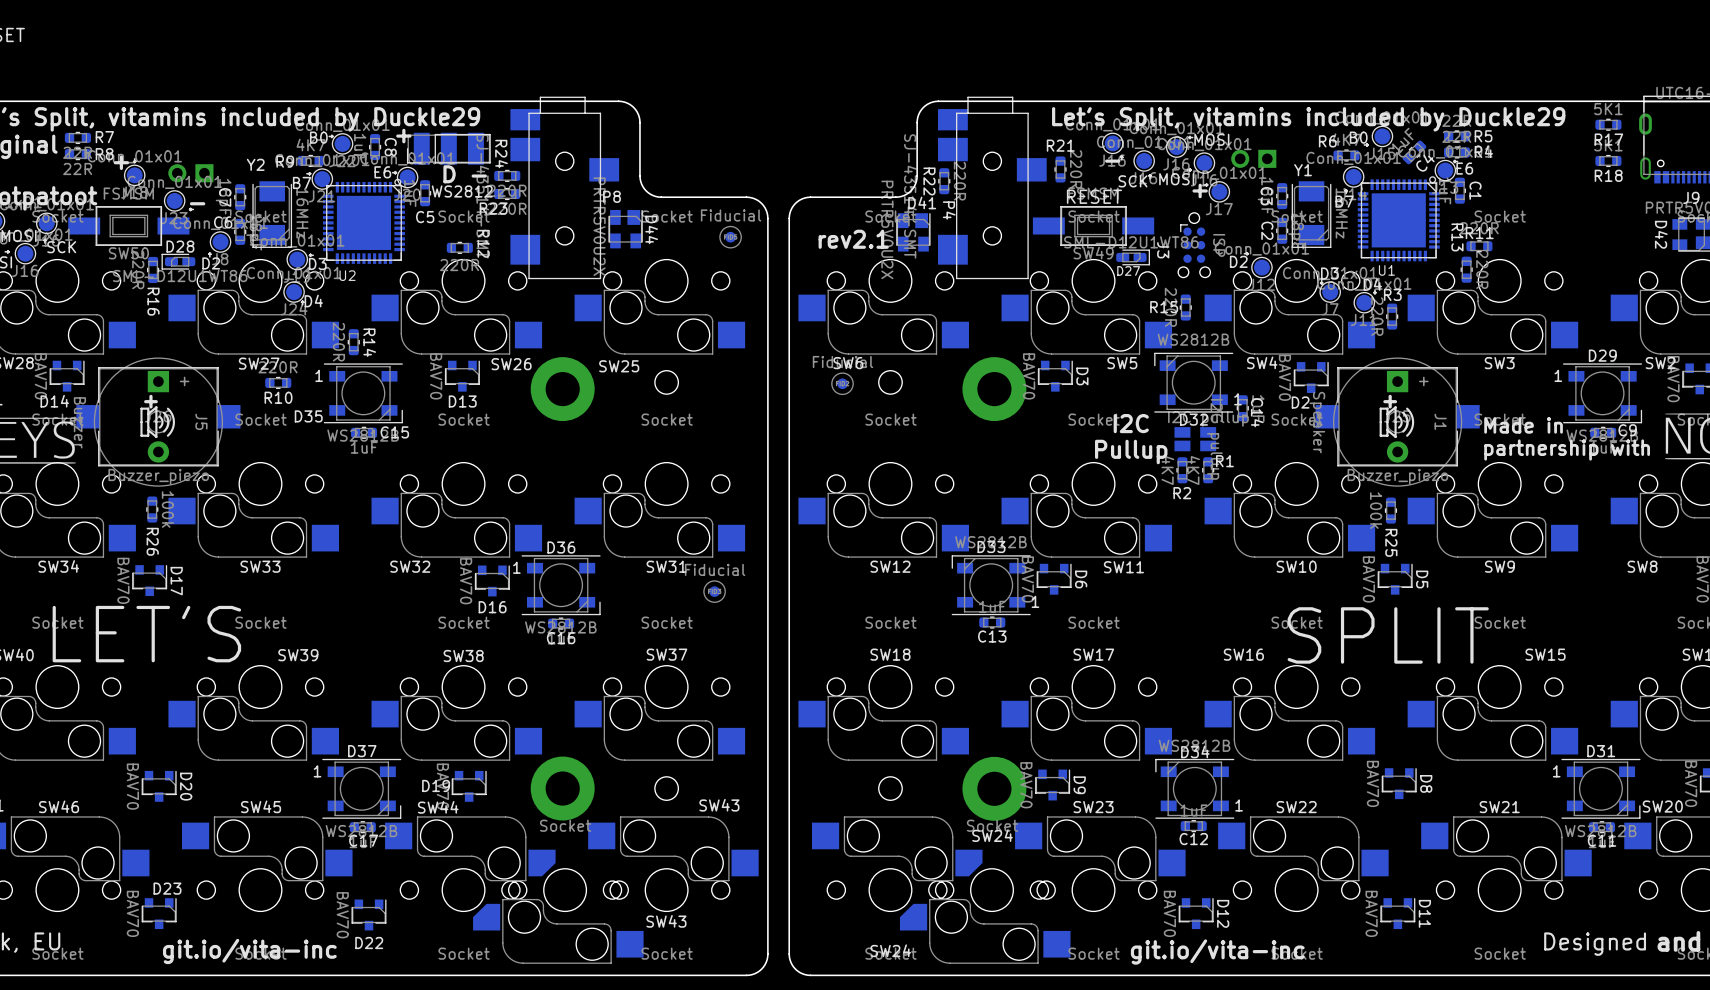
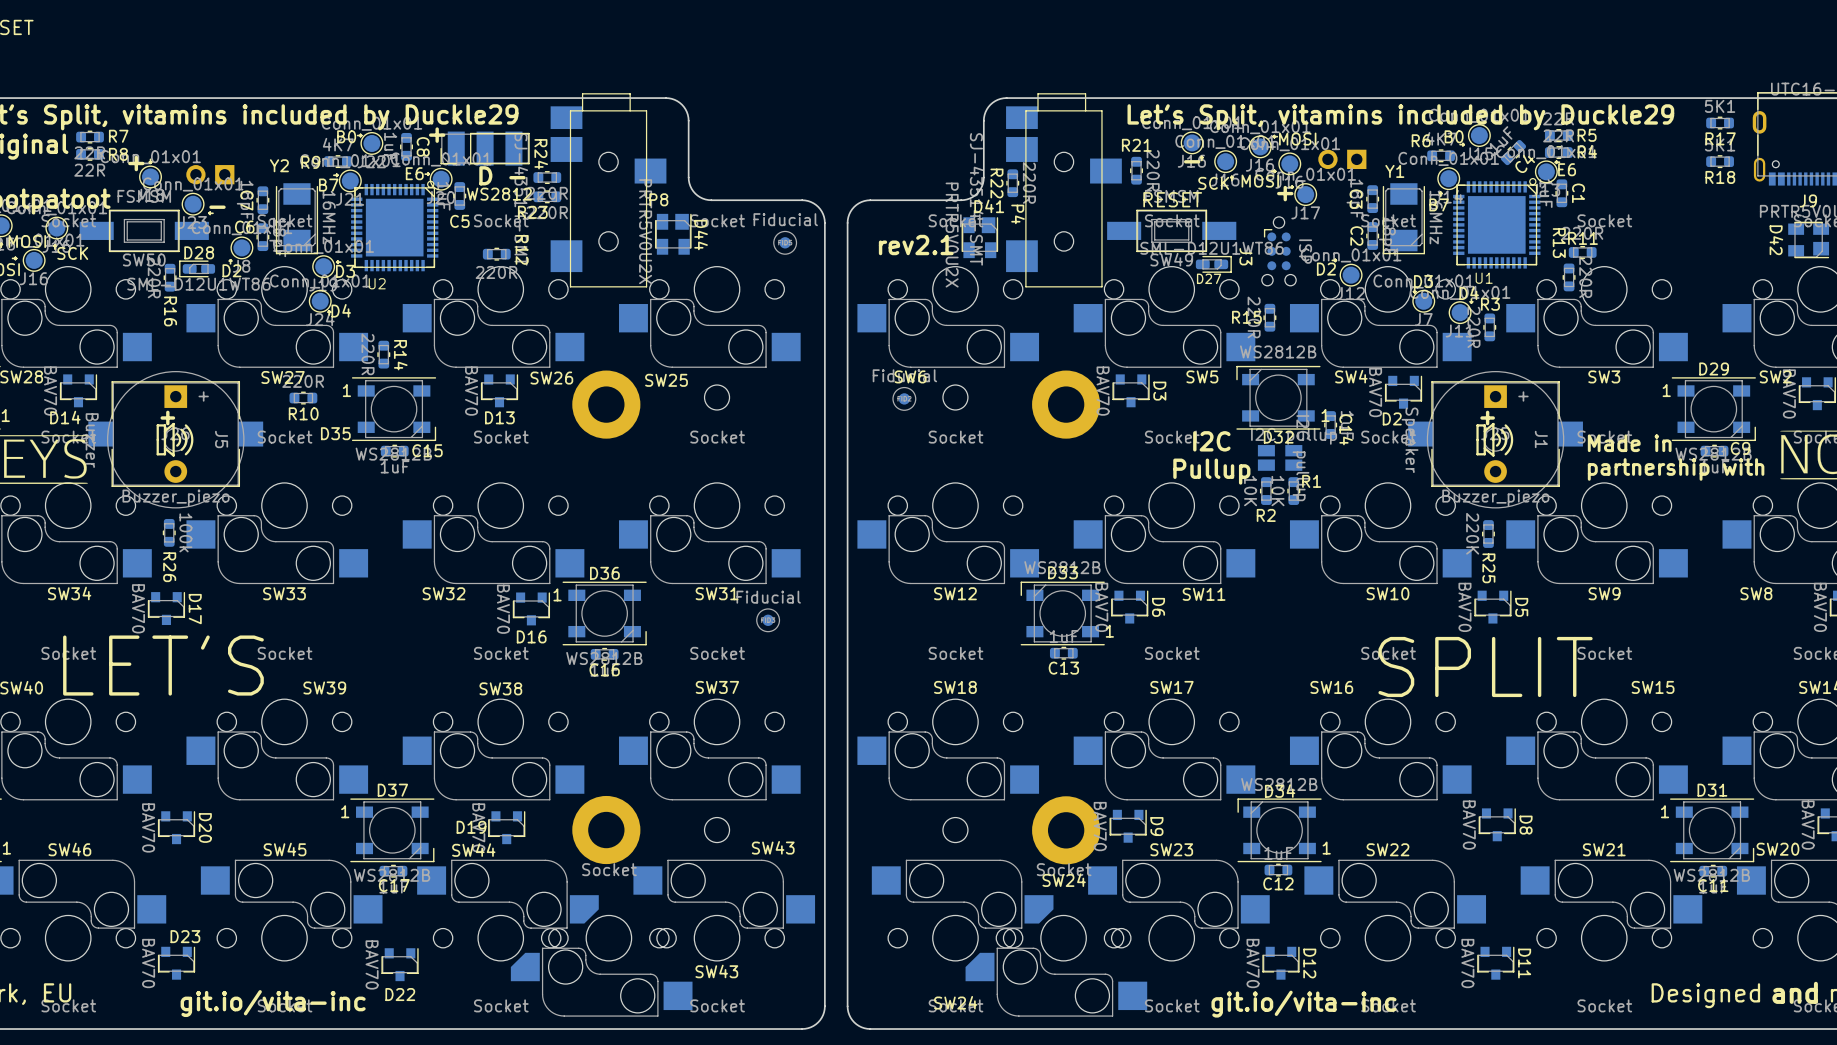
R2 value: 4K7 (1167, 470) -> 10K (1250, 491)
R1 value: 4K7 (1193, 470) -> 10K (1277, 491)
R25 value: 100k (1376, 510) -> 220K (1472, 533)

